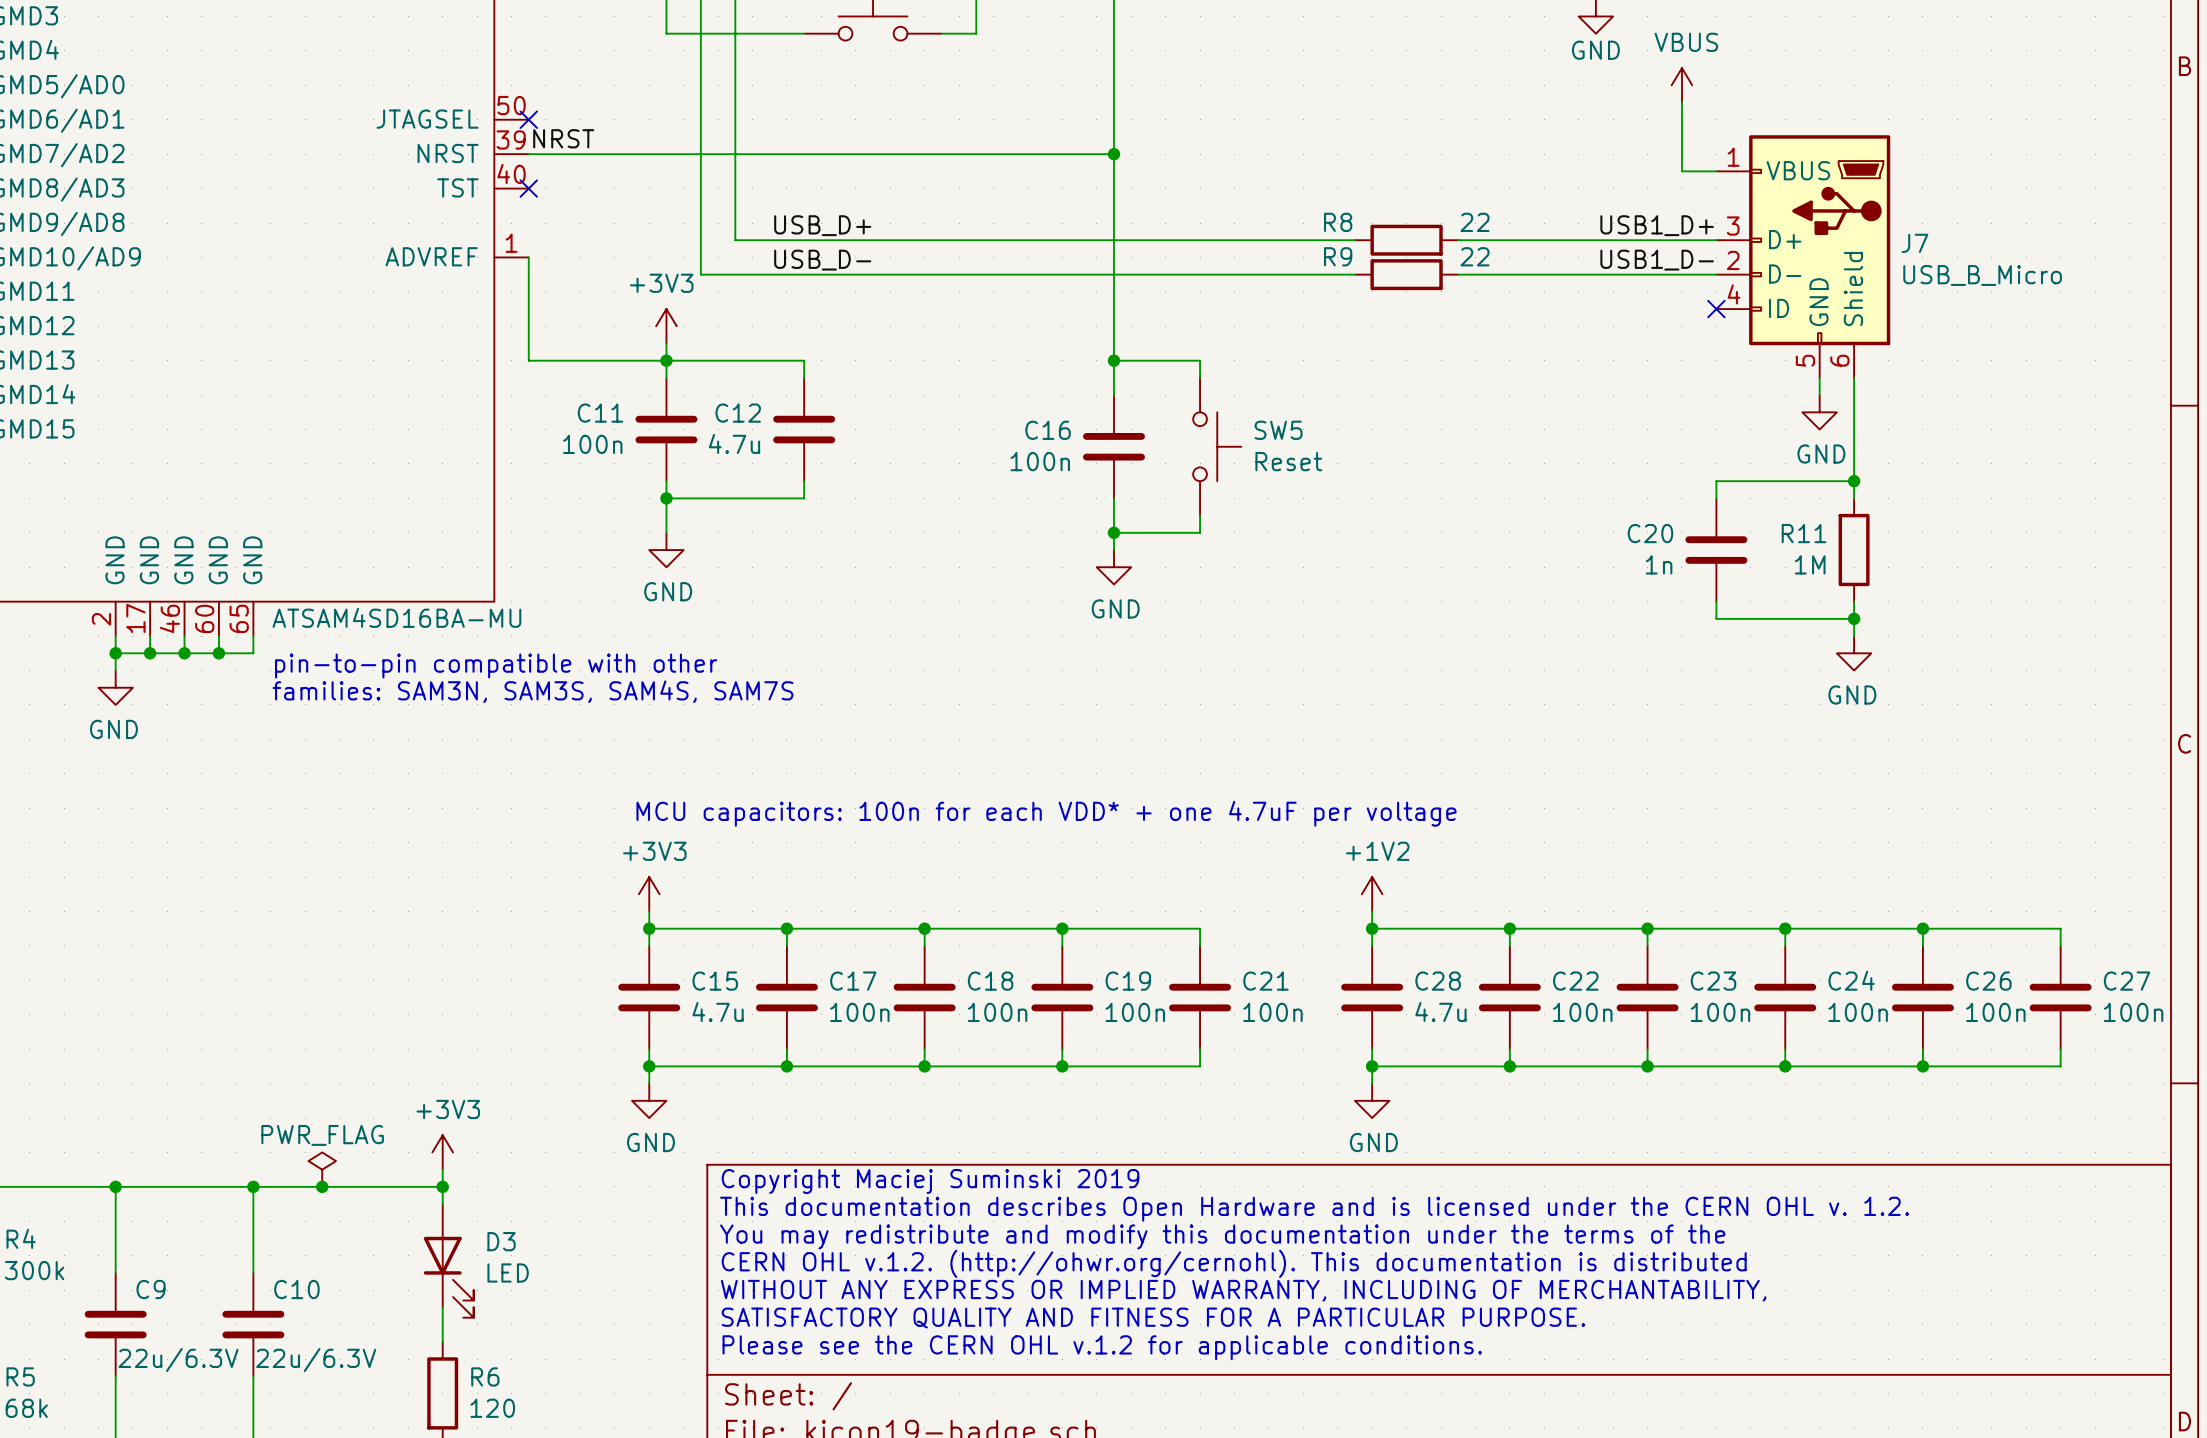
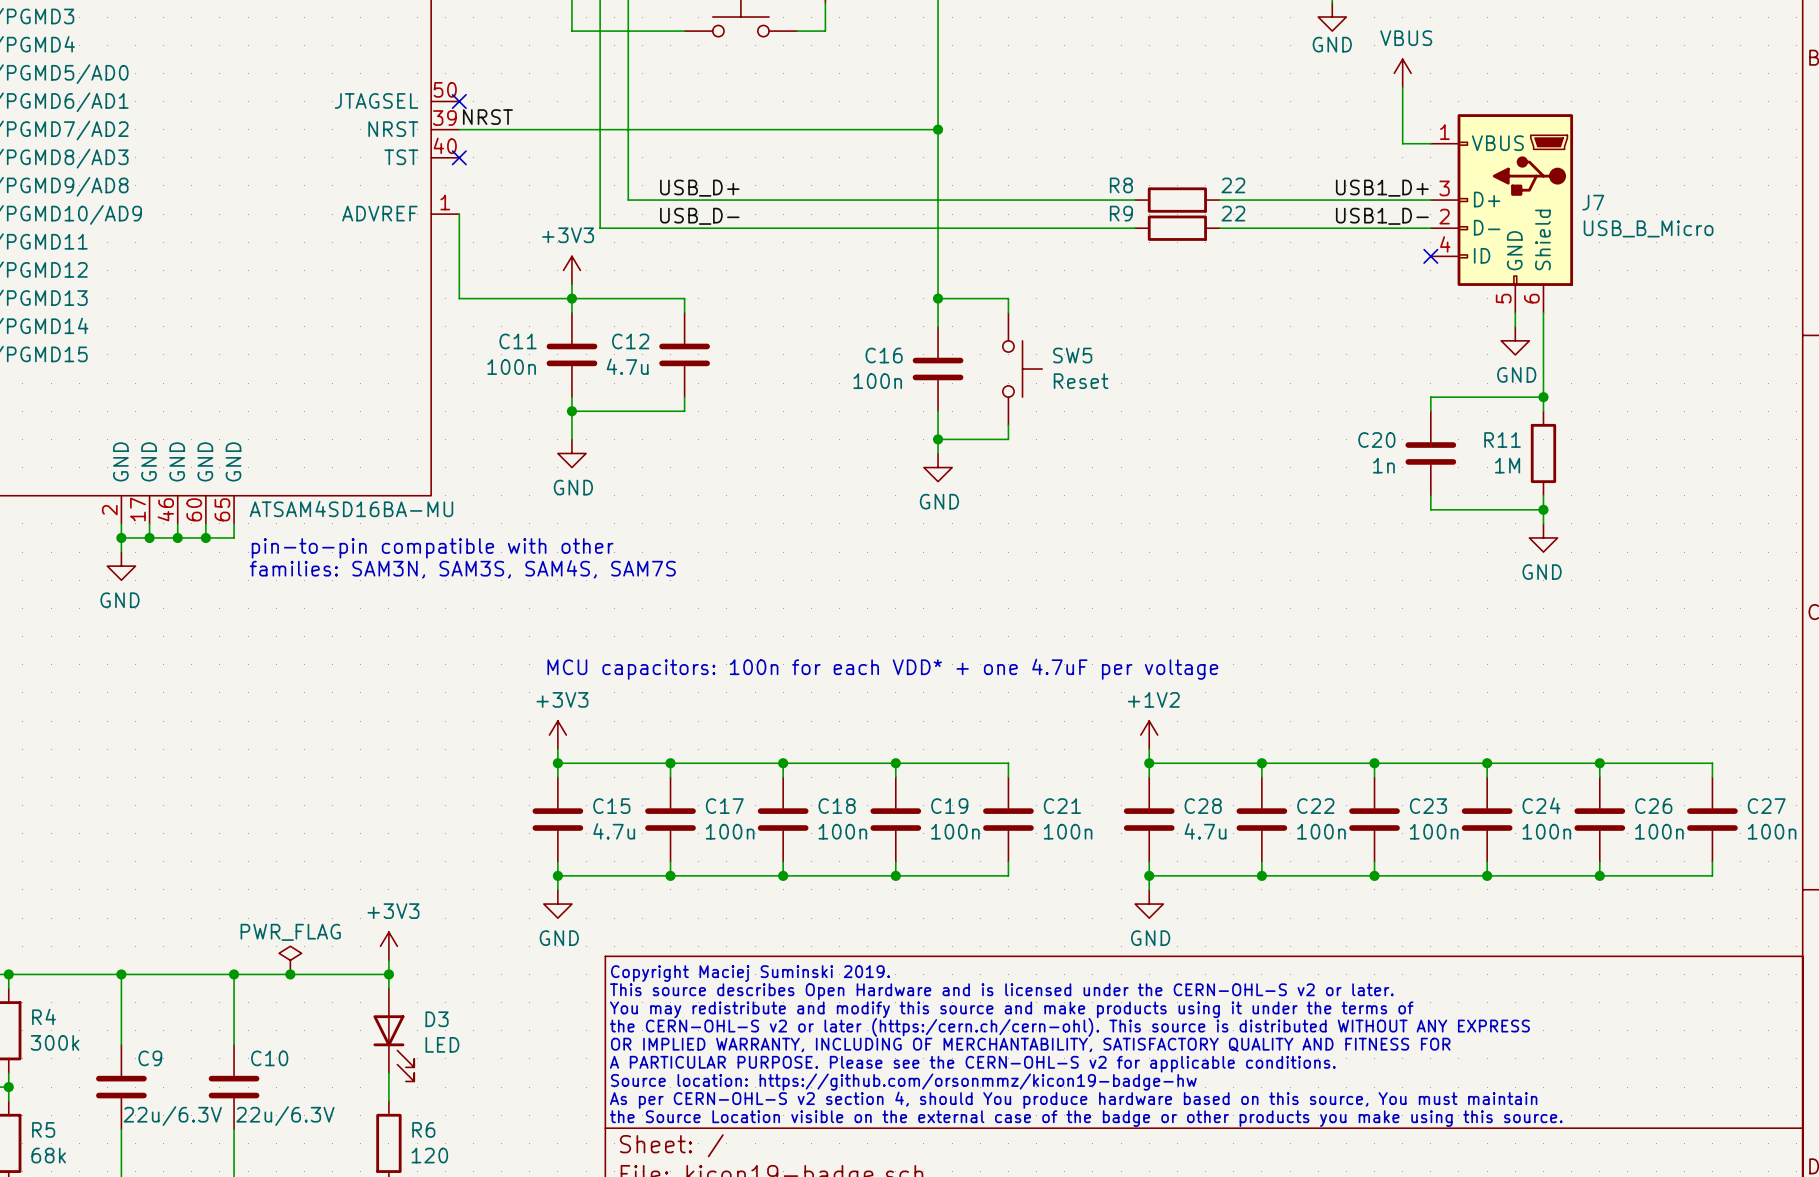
text: Copyright Maciej Suminski 2019 (930, 1181) -> Copyright Maciej Suminski 2019. (750, 973)
text: This documentation describes Open Hardware and is licensed under the CERN OHL v. 1.2. (1314, 1209) -> This source describes Open Hardware and is licensed under the CERN-OHL-S v2 or later. (1001, 991)
text: You may redistribute and modify this documentation under the terms of the (1222, 1236) -> You may redistribute and modify this source and make products using it under the terms of (1011, 1009)
text: none -> the CERN-OHL-S v2 or later (https:/cern.ch/cern-ohl). This source is distributed WITHOUT ANY EXPRESS (1069, 1027)
text: CERN OHL v.1.2. (http://ohwr.org/cernohl). This documentation is distributed (1234, 1263) -> none
text: none -> OR IMPLIED WARRANTY, INCLUDING OF MERCHANTABILITY, SATISFACTORY QUALITY AND FITNESS FOR (1030, 1044)
text: WITHOUT ANY EXPRESS OR IMPLIED WARRANTY, INCLUDING OF MERCHANTABILITY, (1243, 1290) -> A PARTICULAR PURPOSE. Please see the CERN-OHL-S v2 for applicable conditions. (972, 1064)
text: SATISFACTORY QUALITY AND FITNESS FOR A PARTICULAR PURPOSE. (1153, 1318) -> Source location: https://github.com/orsonmmz/kicon19-badge-hw (903, 1082)
text: none -> As per CERN-OHL-S v2 section 4, should You produce hardware based on this source, You must maintain (1073, 1100)
text: Please see the CERN OHL v.1.2 for applicable conditions. (1102, 1347) -> none
text: none -> the Source Location visible on the external case of the badge or other products you make using this source. (1086, 1118)

